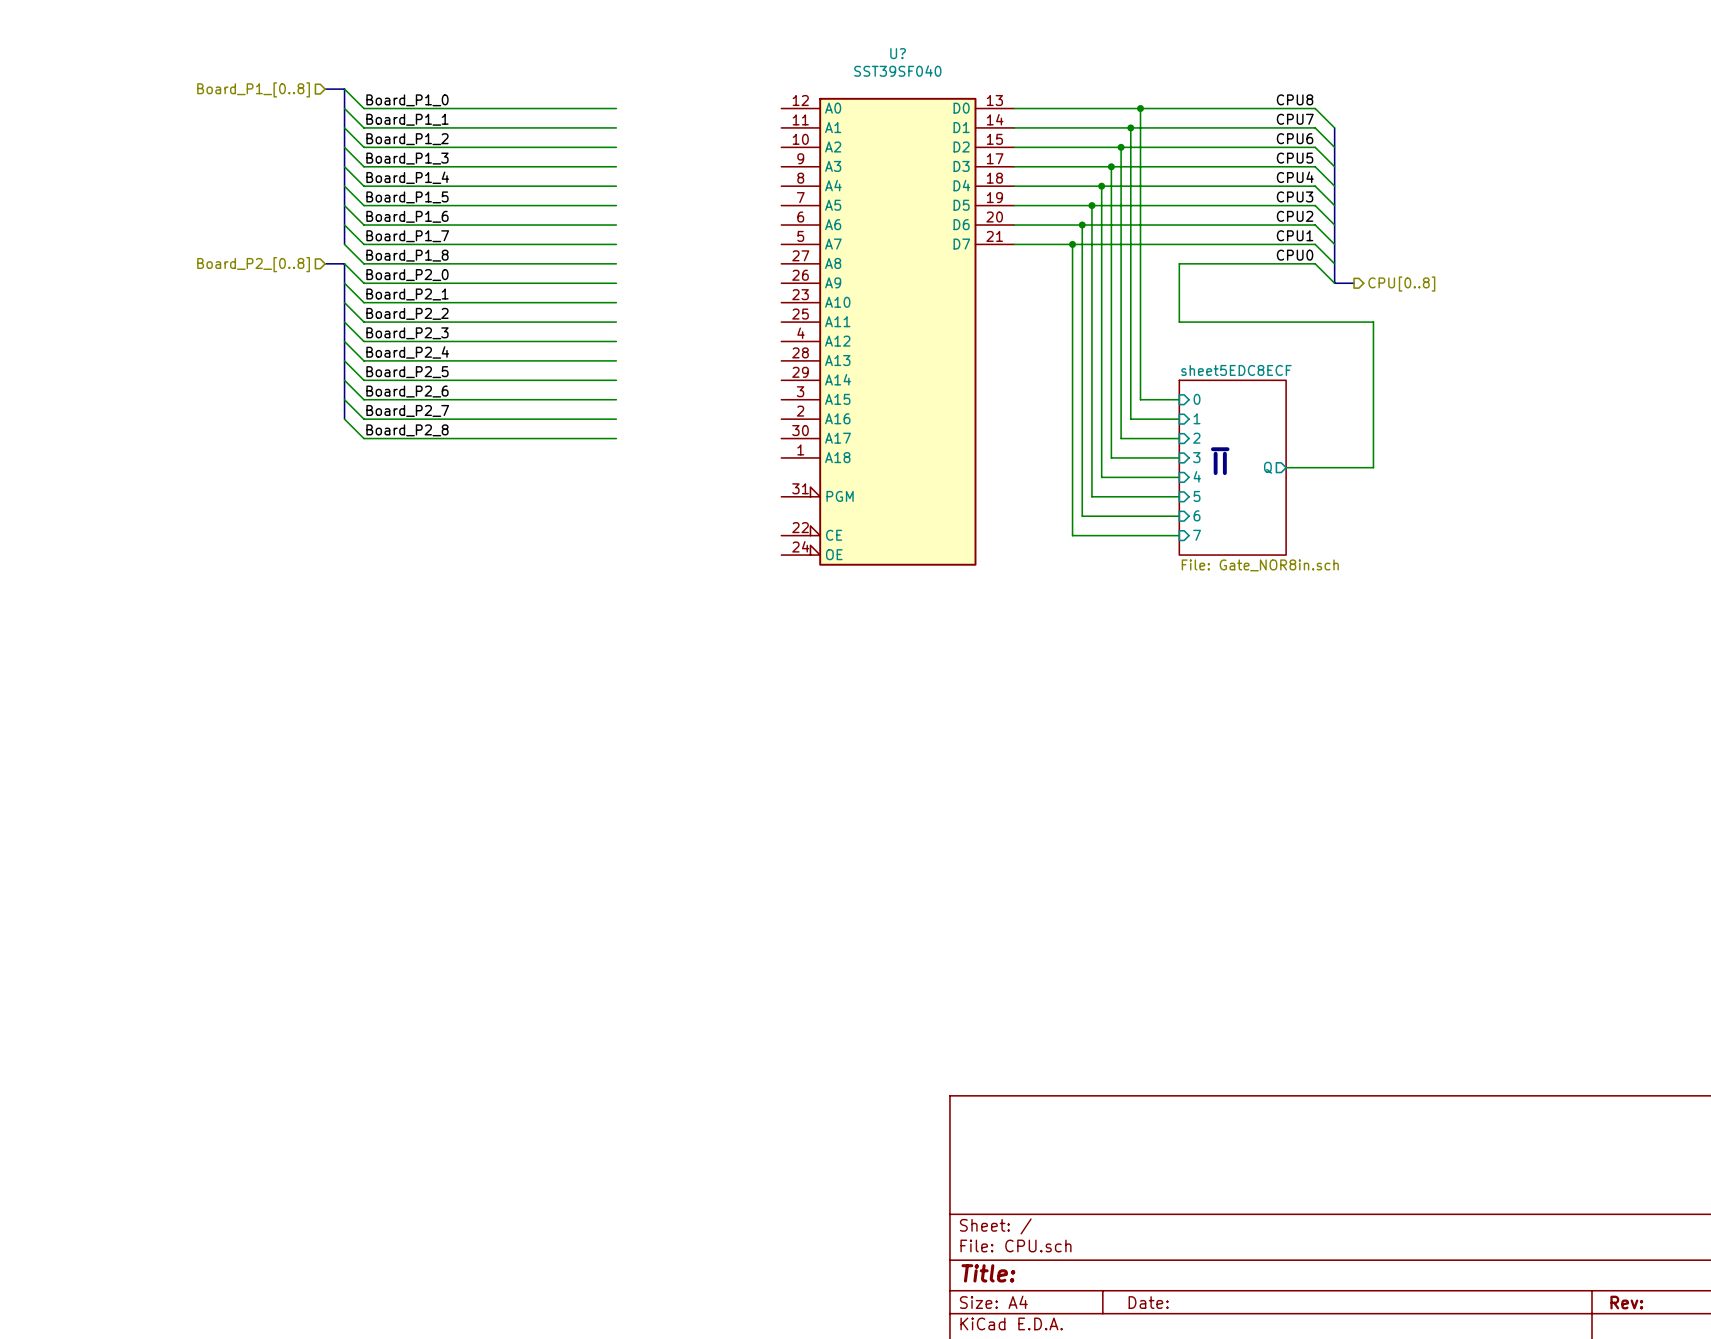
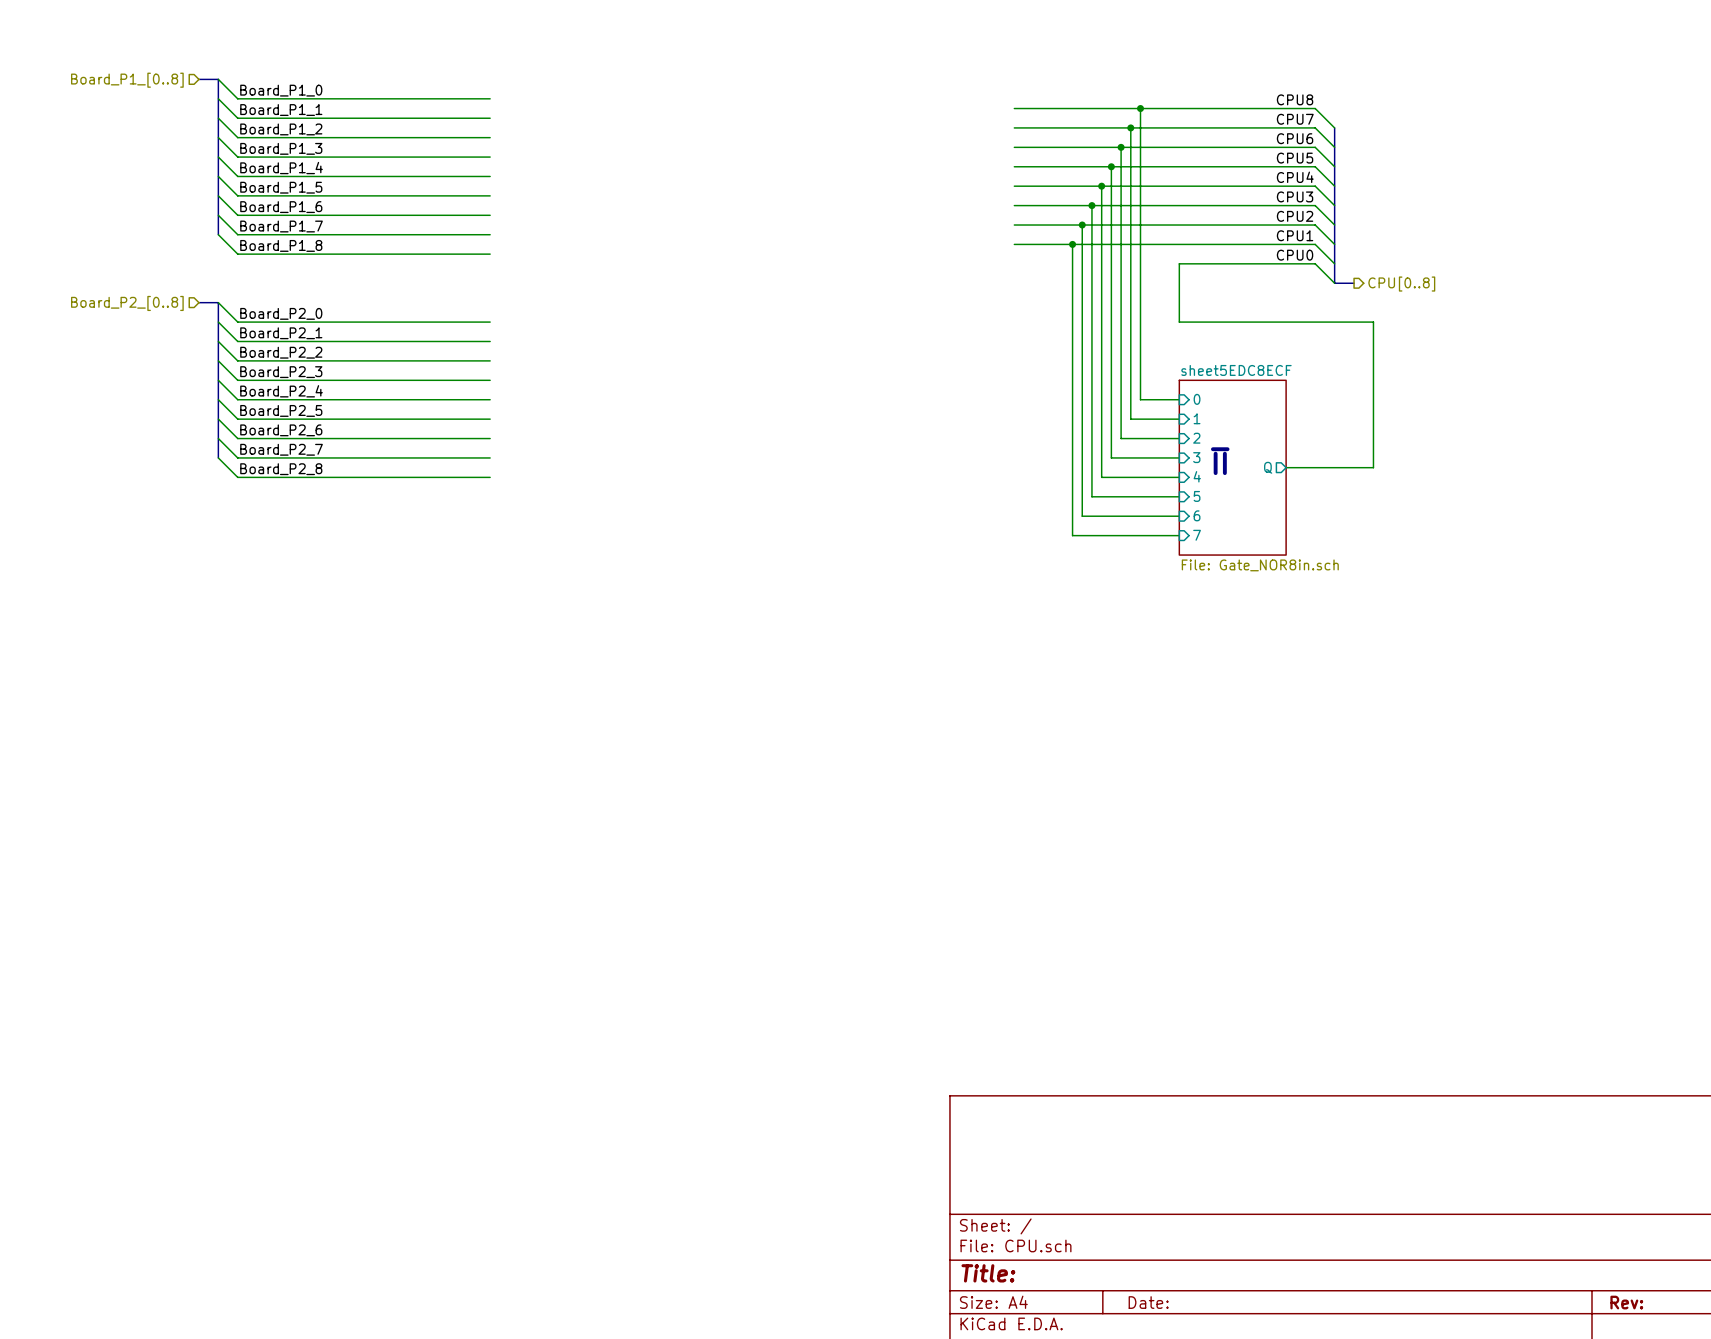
hierarchical label position: Board_P1_[0..8] (253, 89) -> Board_P1_[0..8] (127, 80)
bus: (325, 89) (344, 89) (344, 244) -> (198, 79) (218, 79) (218, 234)
wire: (344, 89) (363, 108) (616, 108) -> (218, 79) (237, 98) (490, 98)
label position: Board_P1_0 (407, 100) -> Board_P1_0 (281, 90)
wire: (344, 108) (363, 127) (616, 127) -> (218, 98) (237, 118) (490, 118)
label position: Board_P1_1 (407, 119) -> Board_P1_1 (281, 110)
wire: (344, 127) (363, 147) (616, 147) -> (218, 118) (237, 137) (490, 137)
label position: Board_P1_2 (407, 139) -> Board_P1_2 (281, 129)
wire: (344, 147) (363, 166) (616, 166) -> (218, 137) (237, 157) (490, 157)
label position: Board_P1_3 (407, 158) -> Board_P1_3 (281, 148)
wire: (344, 166) (363, 186) (616, 186) -> (218, 157) (237, 176) (490, 176)
label position: Board_P1_4 (407, 177) -> Board_P1_4 (281, 168)
wire: (344, 186) (363, 205) (616, 205) -> (218, 176) (237, 195) (490, 195)
label position: Board_P1_5 (407, 197) -> Board_P1_5 (281, 187)
wire: (344, 205) (363, 225) (616, 225) -> (218, 195) (237, 215) (490, 215)
label position: Board_P1_6 (407, 216) -> Board_P1_6 (281, 207)
wire: (344, 225) (363, 244) (616, 244) -> (218, 215) (237, 234) (490, 234)
label position: Board_P1_7 (407, 236) -> Board_P1_7 (281, 226)
wire: (344, 244) (363, 263) (616, 263) -> (218, 234) (237, 254) (490, 254)
label position: Board_P1_8 (407, 255) -> Board_P1_8 (281, 245)
bus: (325, 263) (344, 263) (344, 419) -> (198, 302) (218, 302) (218, 457)
wire: (344, 263) (363, 283) (616, 283) -> none
hierarchical label position: Board_P2_[0..8] (253, 264) -> Board_P2_[0..8] (127, 303)
label position: Board_P2_0 (407, 275) -> Board_P2_0 (281, 313)
wire: (344, 283) (363, 302) (616, 302) -> none
label position: Board_P2_1 (407, 294) -> Board_P2_1 (281, 333)
wire: (344, 302) (363, 322) -> (218, 302) (237, 322) (363, 322)
label position: Board_P2_2 (407, 313) -> Board_P2_2 (281, 352)
wire: (344, 322) (363, 341) -> (218, 322) (237, 341) (363, 341)
wire: (490, 322) (616, 322) -> none
U?: SST39SF040 (897, 331) -> none
label position: Board_P2_3 (407, 333) -> Board_P2_3 (281, 372)
wire: (344, 341) (363, 360) -> (218, 341) (237, 360) (363, 360)
wire: (490, 341) (616, 341) -> none
label position: Board_P2_4 (407, 352) -> Board_P2_4 (281, 391)
wire: (344, 360) (363, 380) -> (218, 360) (237, 380) (363, 380)
wire: (490, 360) (616, 360) -> none
label position: Board_P2_5 (407, 372) -> Board_P2_5 (281, 410)
wire: (344, 380) (363, 399) -> (218, 380) (237, 399) (363, 399)
wire: (490, 380) (616, 380) -> none
label position: Board_P2_6 (407, 391) -> Board_P2_6 (281, 430)
wire: (344, 399) (363, 419) -> (218, 399) (237, 419) (363, 419)
wire: (490, 399) (616, 399) -> none
label position: Board_P2_7 (407, 410) -> Board_P2_7 (281, 449)
wire: (344, 419) (363, 438) -> (218, 419) (237, 438) (363, 438)
wire: (490, 419) (616, 419) -> none
label position: Board_P2_8 (407, 430) -> Board_P2_8 (281, 469)
wire: none -> (218, 438) (237, 457) (490, 457)
wire: (490, 438) (616, 438) -> none
wire: none -> (218, 457) (237, 477) (490, 477)

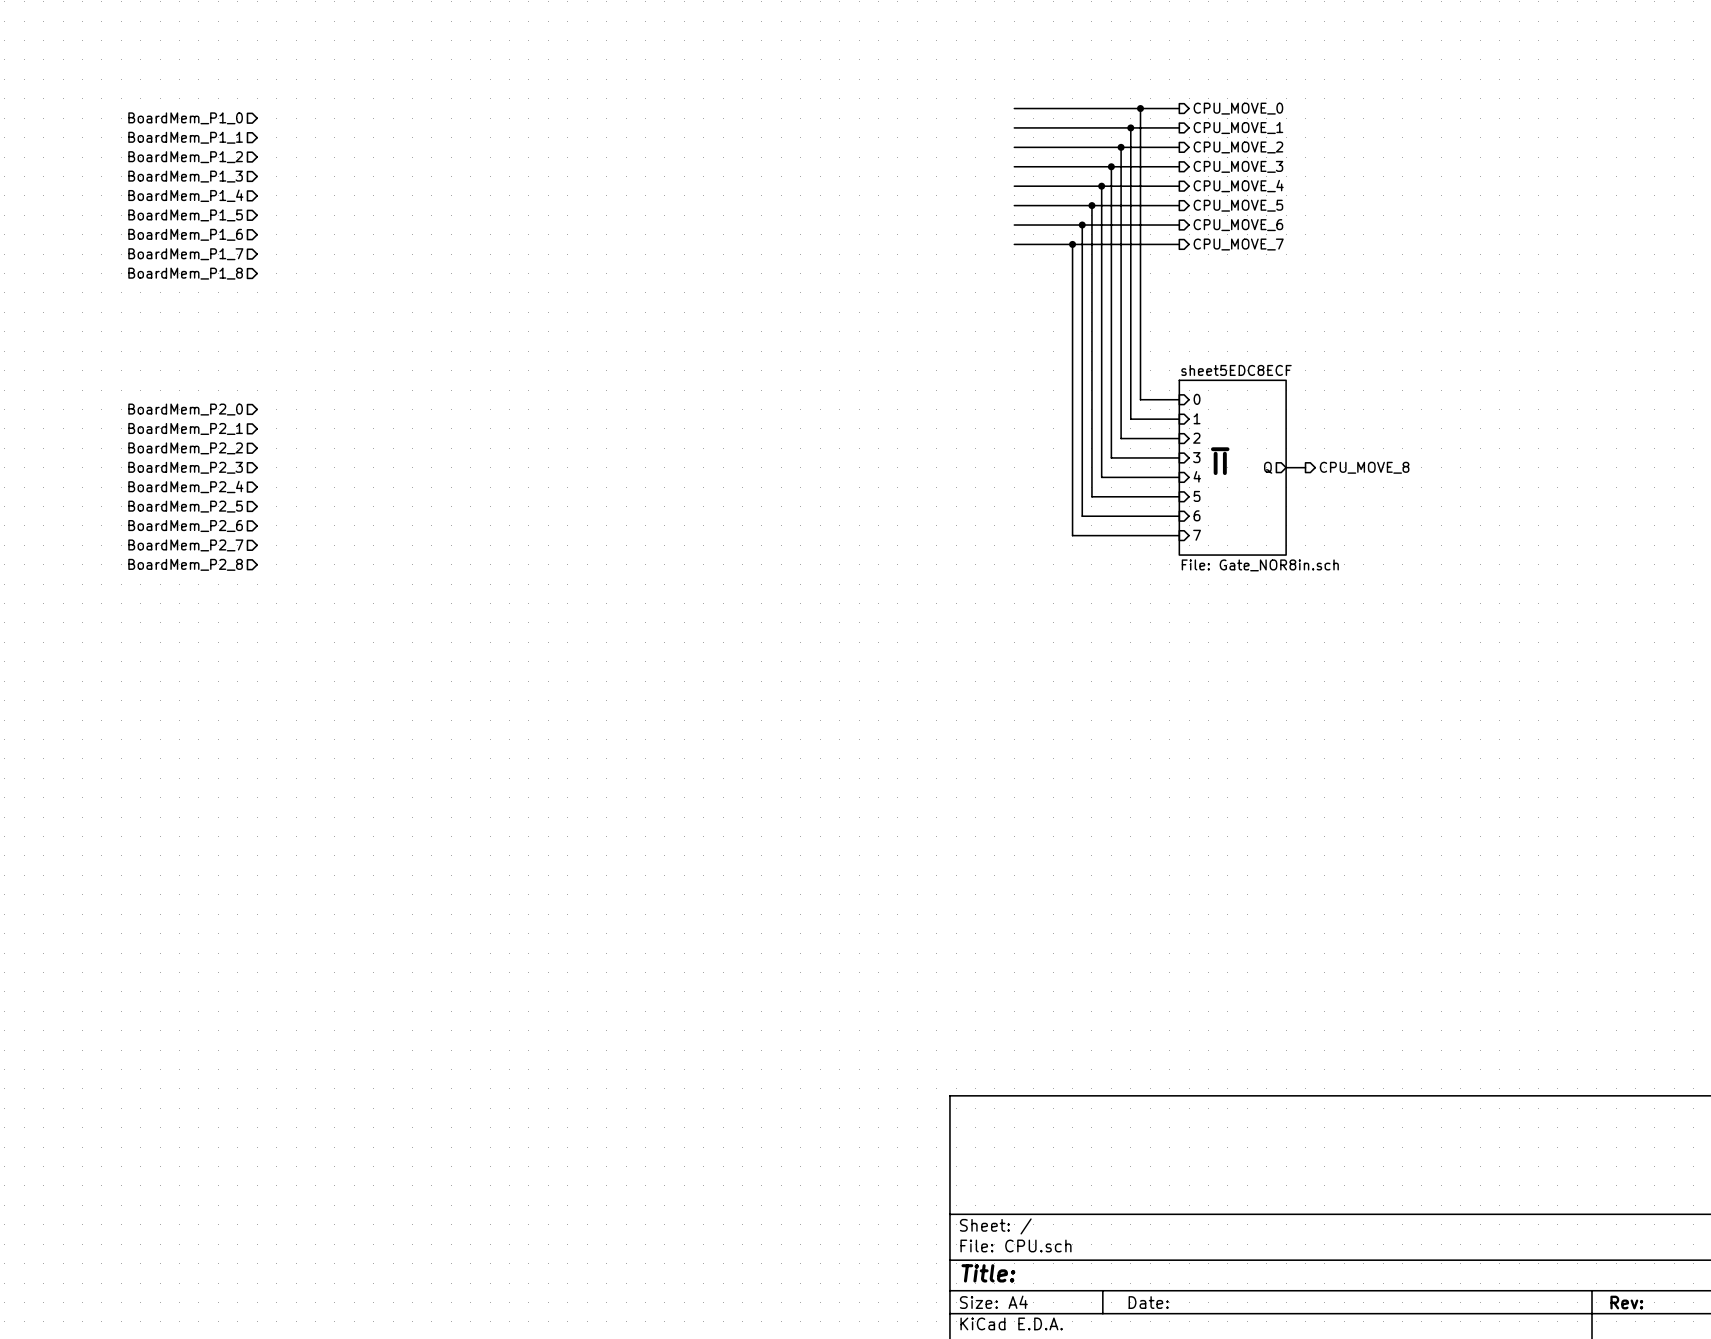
bus: (198, 79) (218, 79) (218, 234) -> none
wire: (218, 79) (237, 98) (490, 98) -> none
hierarchical label: Board_P1_[0..8] (127, 80) -> none
label: Board_P1_0 (281, 90) -> none
wire: (218, 98) (237, 118) (490, 118) -> none
label: CPU8 (1295, 99) -> none
wire: (1179, 108) (1315, 108) (1334, 127) -> none
hierarchical label: none -> CPU_MOVE_0 (1238, 108)
label: Board_P1_1 (281, 110) -> none
hierarchical label: none -> BoardMem_P1_0 (185, 118)
wire: (218, 118) (237, 137) (490, 137) -> none
label: CPU7 (1295, 119) -> none
wire: (1179, 127) (1315, 127) (1334, 147) -> none
bus: (1334, 127) (1334, 283) (1354, 283) -> none
hierarchical label: none -> CPU_MOVE_1 (1238, 128)
label: Board_P1_2 (281, 129) -> none
hierarchical label: none -> BoardMem_P1_1 (185, 137)
wire: (218, 137) (237, 157) (490, 157) -> none
label: CPU6 (1295, 138) -> none
wire: (1179, 147) (1315, 147) (1334, 166) -> none
hierarchical label: none -> CPU_MOVE_2 (1238, 147)
label: Board_P1_3 (281, 148) -> none
hierarchical label: none -> BoardMem_P1_2 (185, 157)
wire: (218, 157) (237, 176) (490, 176) -> none
label: CPU5 (1295, 158) -> none
wire: (1179, 166) (1315, 166) (1334, 186) -> none
hierarchical label: none -> CPU_MOVE_3 (1238, 166)
label: Board_P1_4 (281, 168) -> none
hierarchical label: none -> BoardMem_P1_3 (185, 176)
wire: (218, 176) (237, 195) (490, 195) -> none
label: CPU4 (1295, 177) -> none
wire: (1179, 186) (1315, 186) (1334, 205) -> none
hierarchical label: none -> CPU_MOVE_4 (1238, 186)
label: Board_P1_5 (281, 187) -> none
hierarchical label: none -> BoardMem_P1_4 (185, 195)
wire: (218, 195) (237, 215) (490, 215) -> none
label: CPU3 (1295, 196) -> none
wire: (1179, 205) (1315, 205) (1334, 225) -> none
hierarchical label: none -> CPU_MOVE_5 (1238, 205)
label: Board_P1_6 (281, 207) -> none
hierarchical label: none -> BoardMem_P1_5 (185, 215)
wire: (218, 215) (237, 234) (490, 234) -> none
label: CPU2 (1295, 216) -> none
wire: (1179, 225) (1315, 225) (1334, 244) -> none
hierarchical label: none -> CPU_MOVE_6 (1238, 225)
label: Board_P1_7 (281, 226) -> none
hierarchical label: none -> BoardMem_P1_6 (185, 234)
wire: (218, 234) (237, 254) (490, 254) -> none
label: CPU1 (1295, 235) -> none
wire: (1179, 244) (1315, 244) (1334, 263) -> none
hierarchical label: none -> CPU_MOVE_7 (1238, 244)
label: Board_P1_8 (281, 245) -> none
hierarchical label: none -> BoardMem_P1_7 (185, 254)
label: CPU0 (1295, 255) -> none
hierarchical label: none -> BoardMem_P1_8 (185, 273)
wire: (1334, 283) (1315, 263) (1179, 263) (1179, 322) (1373, 322) (1373, 467) (1305, 467) -> none
hierarchical label: CPU[0..8] (1401, 284) -> none
bus: (198, 302) (218, 302) (218, 457) -> none
wire: (218, 302) (237, 322) (490, 322) -> none
hierarchical label: Board_P2_[0..8] (127, 303) -> none
label: Board_P2_0 (281, 313) -> none
wire: (218, 322) (237, 341) (490, 341) -> none
label: Board_P2_1 (281, 333) -> none
wire: (218, 341) (237, 360) (490, 360) -> none
label: Board_P2_2 (281, 352) -> none
wire: (218, 360) (237, 380) (490, 380) -> none
label: Board_P2_3 (281, 372) -> none
wire: (218, 380) (237, 399) (490, 399) -> none
label: Board_P2_4 (281, 391) -> none
wire: (218, 399) (237, 419) (490, 419) -> none
hierarchical label: none -> BoardMem_P2_0 (185, 409)
label: Board_P2_5 (281, 410) -> none
wire: (218, 419) (237, 438) (490, 438) -> none
hierarchical label: none -> BoardMem_P2_1 (185, 428)
label: Board_P2_6 (281, 430) -> none
wire: (218, 438) (237, 457) (490, 457) -> none
hierarchical label: none -> BoardMem_P2_2 (185, 448)
label: Board_P2_7 (281, 449) -> none
wire: (218, 457) (237, 477) (490, 477) -> none
hierarchical label: none -> BoardMem_P2_3 (185, 467)
hierarchical label: none -> CPU_MOVE_8 (1364, 467)
label: Board_P2_8 (281, 469) -> none
hierarchical label: none -> BoardMem_P2_4 (185, 486)
hierarchical label: none -> BoardMem_P2_5 (185, 506)
hierarchical label: none -> BoardMem_P2_6 (185, 526)
hierarchical label: none -> BoardMem_P2_7 (185, 545)
hierarchical label: none -> BoardMem_P2_8 (185, 564)

